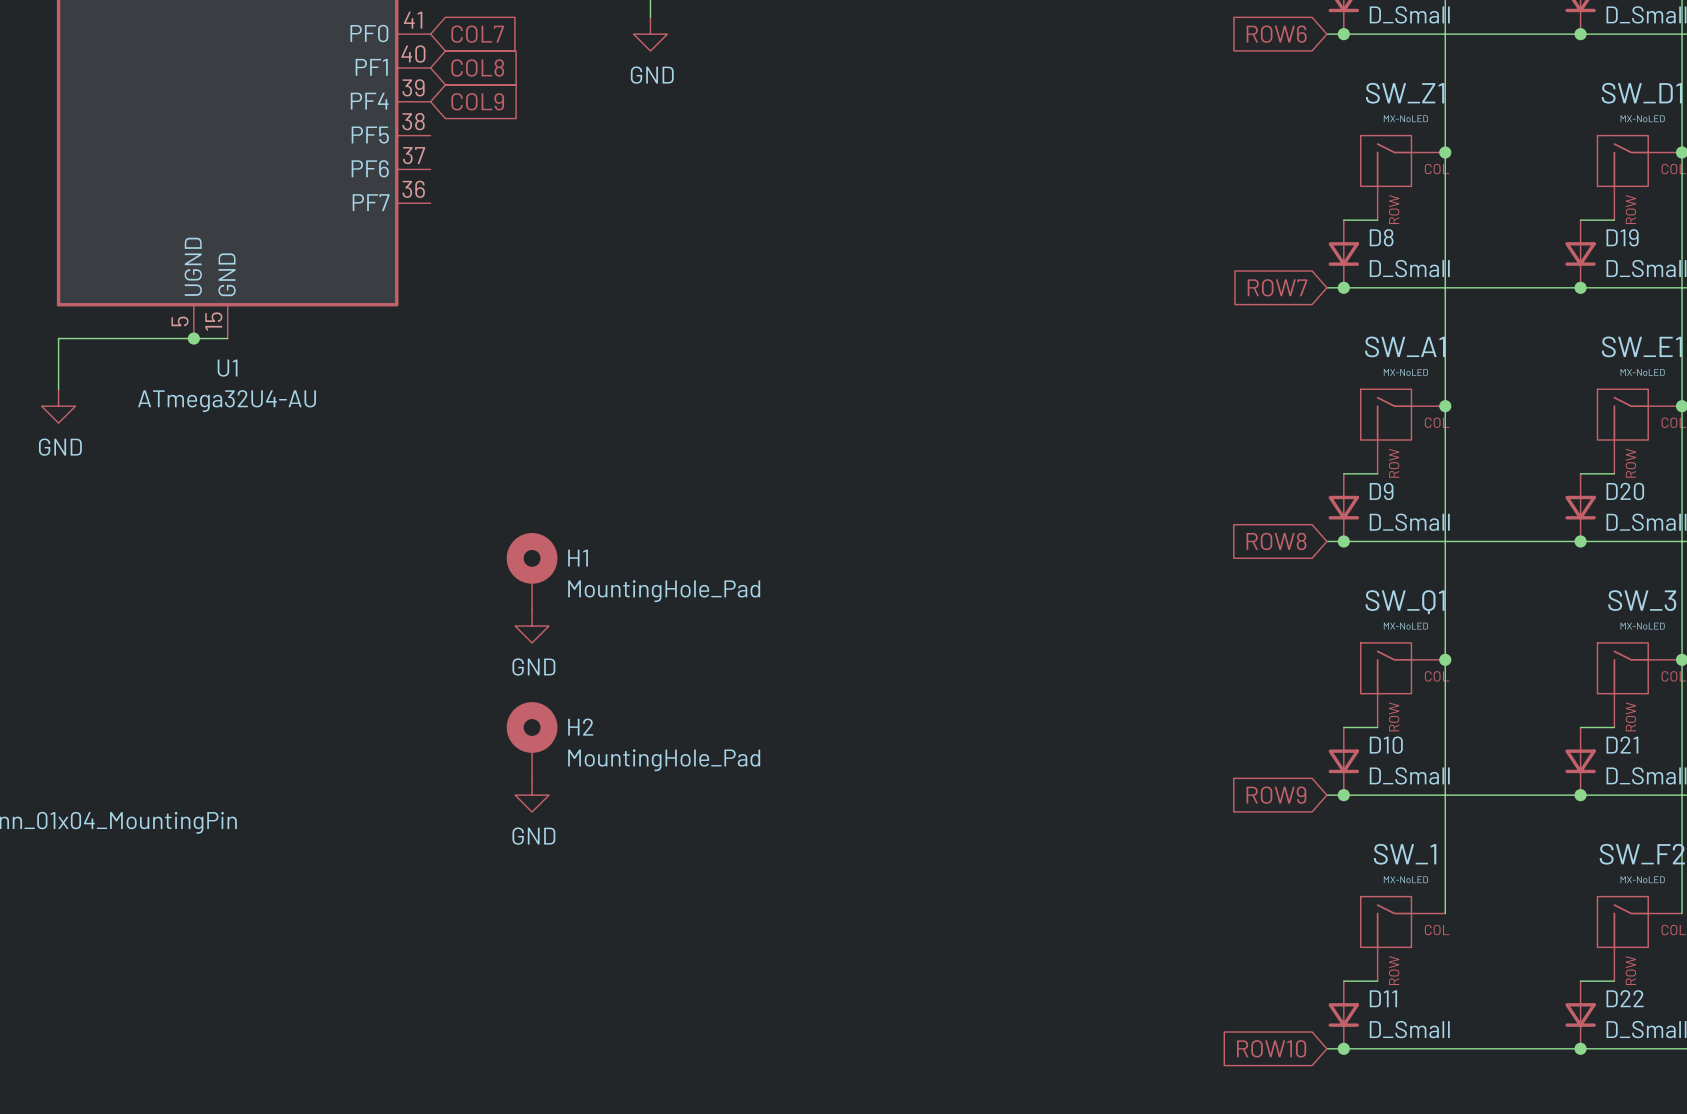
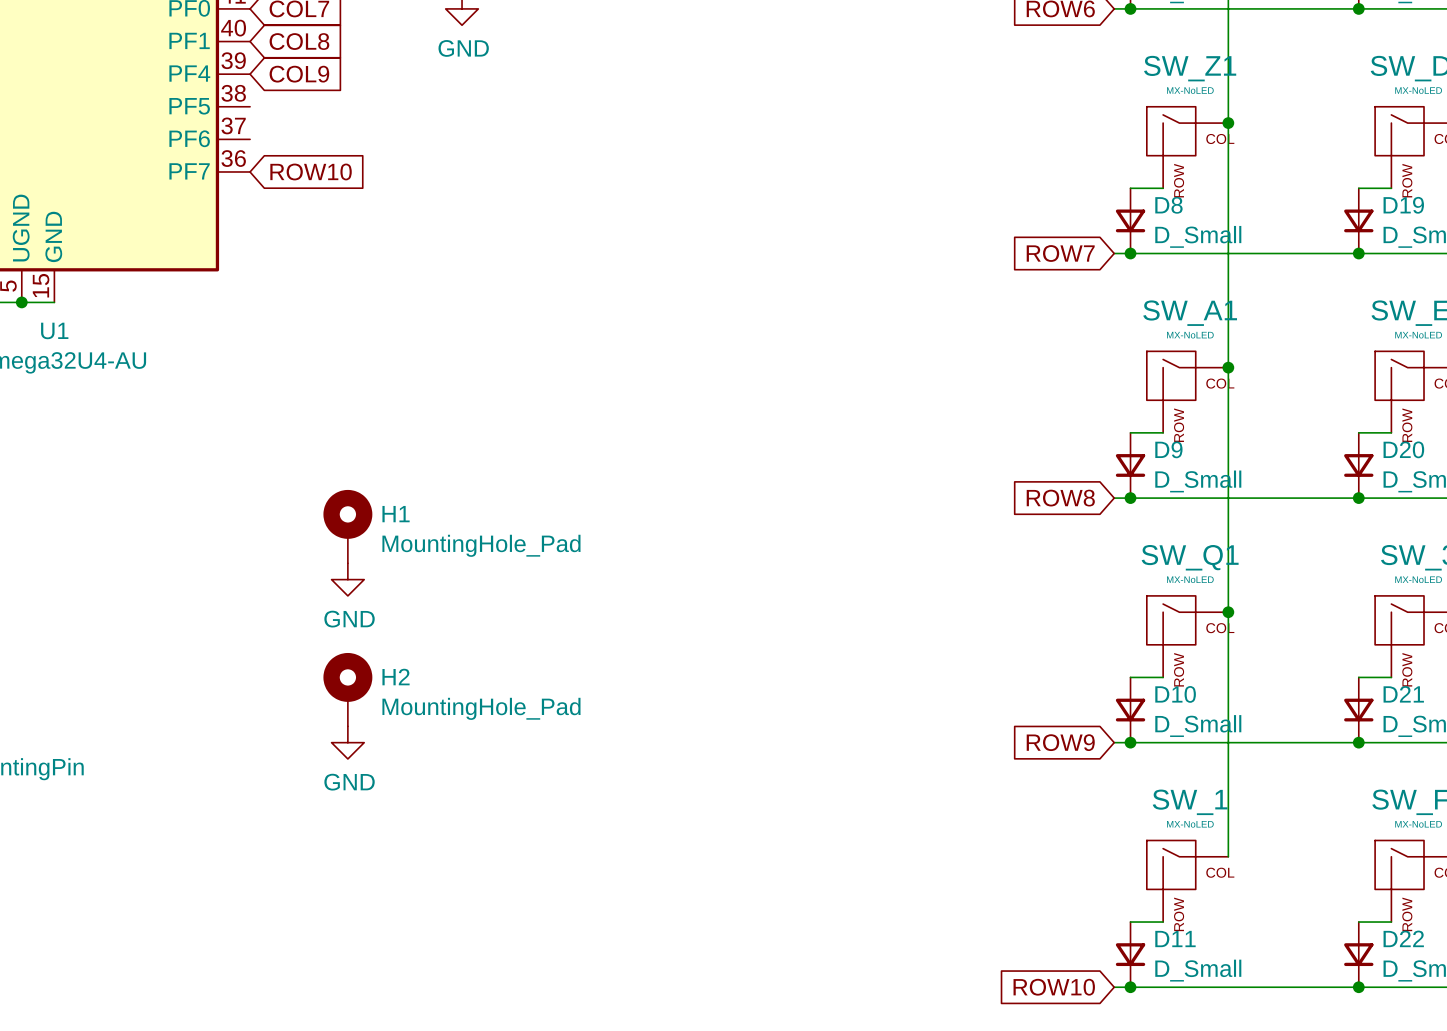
global label: none -> ROW10 (311, 171)

